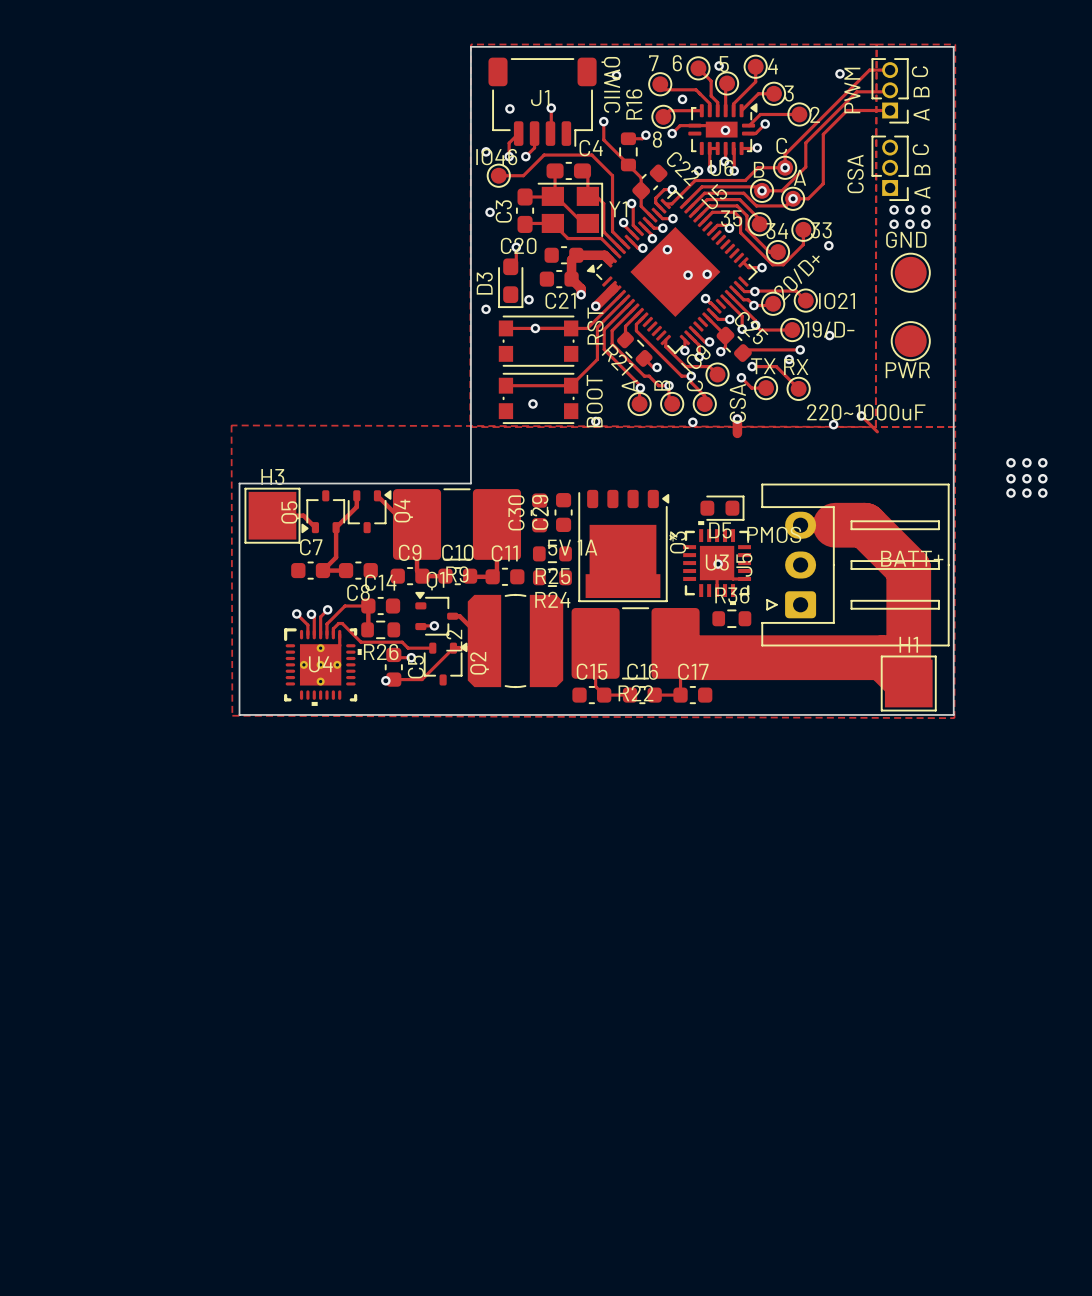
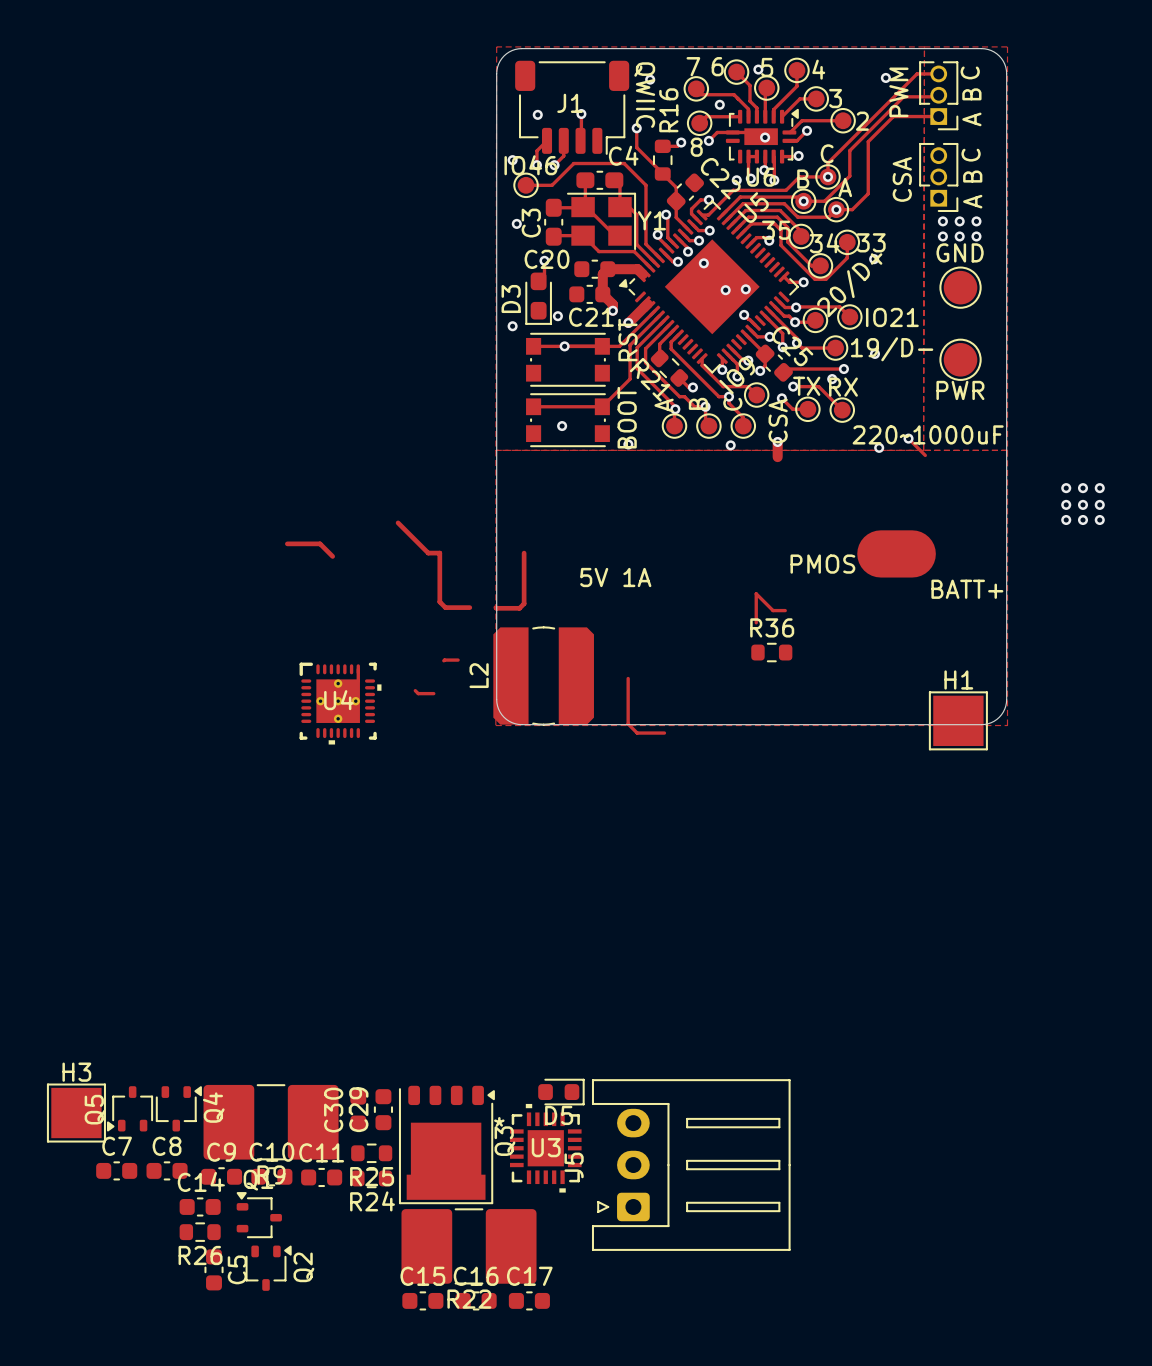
board edge: (470, 69) (470, 46) (953, 46) (953, 714) (239, 714) (239, 483) (470, 483) -> (496, 73) (498, 64) (504, 55) (512, 50) (521, 48) (981, 48) (994, 51) (1001, 58) (1006, 73) (1006, 699) (1004, 709) (996, 719) (981, 724) (521, 724) (512, 722) (501, 714) (496, 702) (496, 509)
zone outline: (231, 425) (955, 427) (954, 718) (232, 715) (231, 425) -> none
zone outline: none -> (495, 450) (495, 725) (1007, 725) (1007, 450)
track: (356, 495) (356, 506) (336, 527) (336, 557) (322, 570) (346, 570) -> none
D5 position: (722, 508) -> (561, 1092)
Q5 position: (323, 511) -> (130, 1108)
Q4 position: (369, 511) -> (178, 1108)
C30 position: (539, 512) -> (358, 1110)
C29 position: (563, 512) -> (383, 1109)
H3 position: (272, 515) -> (76, 1113)
R9 position: (457, 524) -> (271, 1122)
track: (800, 525) (865, 525) (908, 568) (908, 683) (882, 657) (689, 657) (675, 643) (675, 664) (680, 669) (680, 695) (654, 695) -> none
Q3 position: (623, 546) -> (446, 1144)
R25 position: (552, 553) -> (371, 1153)
U3 position: (717, 563) -> (545, 1148)
via: (718, 564) -> none
J5 position: (855, 565) -> (691, 1165)
C7 position: (310, 570) -> (116, 1170)
C8 position: (358, 570) -> (167, 1170)
C9 position: (410, 576) -> (221, 1176)
C10 position: (457, 576) -> (271, 1176)
C11 position: (504, 576) -> (321, 1177)
R24 position: (552, 577) -> (371, 1178)
C8 name position: C8 (358, 592) -> C8 (167, 1146)
C14 position: (380, 606) -> (200, 1206)
track: (327, 609) (320, 616) (320, 634) -> none
via: (327, 609) -> none
track: (296, 613) (307, 625) (307, 634) -> none
via: (296, 613) -> none
Q1 position: (436, 613) -> (259, 1215)
track: (311, 614) (314, 617) (314, 634) -> none
via: (311, 614) -> none
track: (452, 616) (459, 616) (484, 641) (477, 648) (453, 648) (422, 679) (385, 680) -> none
via: (434, 625) -> none
track: (367, 629) (368, 606) (345, 606) (327, 624) (327, 634) -> none
R26 position: (380, 629) -> (200, 1232)
track: (333, 634) (333, 628) (338, 623) (342, 623) (360, 642) (402, 642) (408, 648) (432, 648) -> none
R22 position: (635, 643) -> (469, 1246)
via: (411, 657) -> none
Q2 position: (445, 664) -> (268, 1268)
C5 position: (393, 667) -> (214, 1269)
via: (385, 680) -> none
C15 position: (591, 695) -> (422, 1300)
C16 position: (642, 695) -> (476, 1300)
C17 position: (692, 695) -> (529, 1300)

